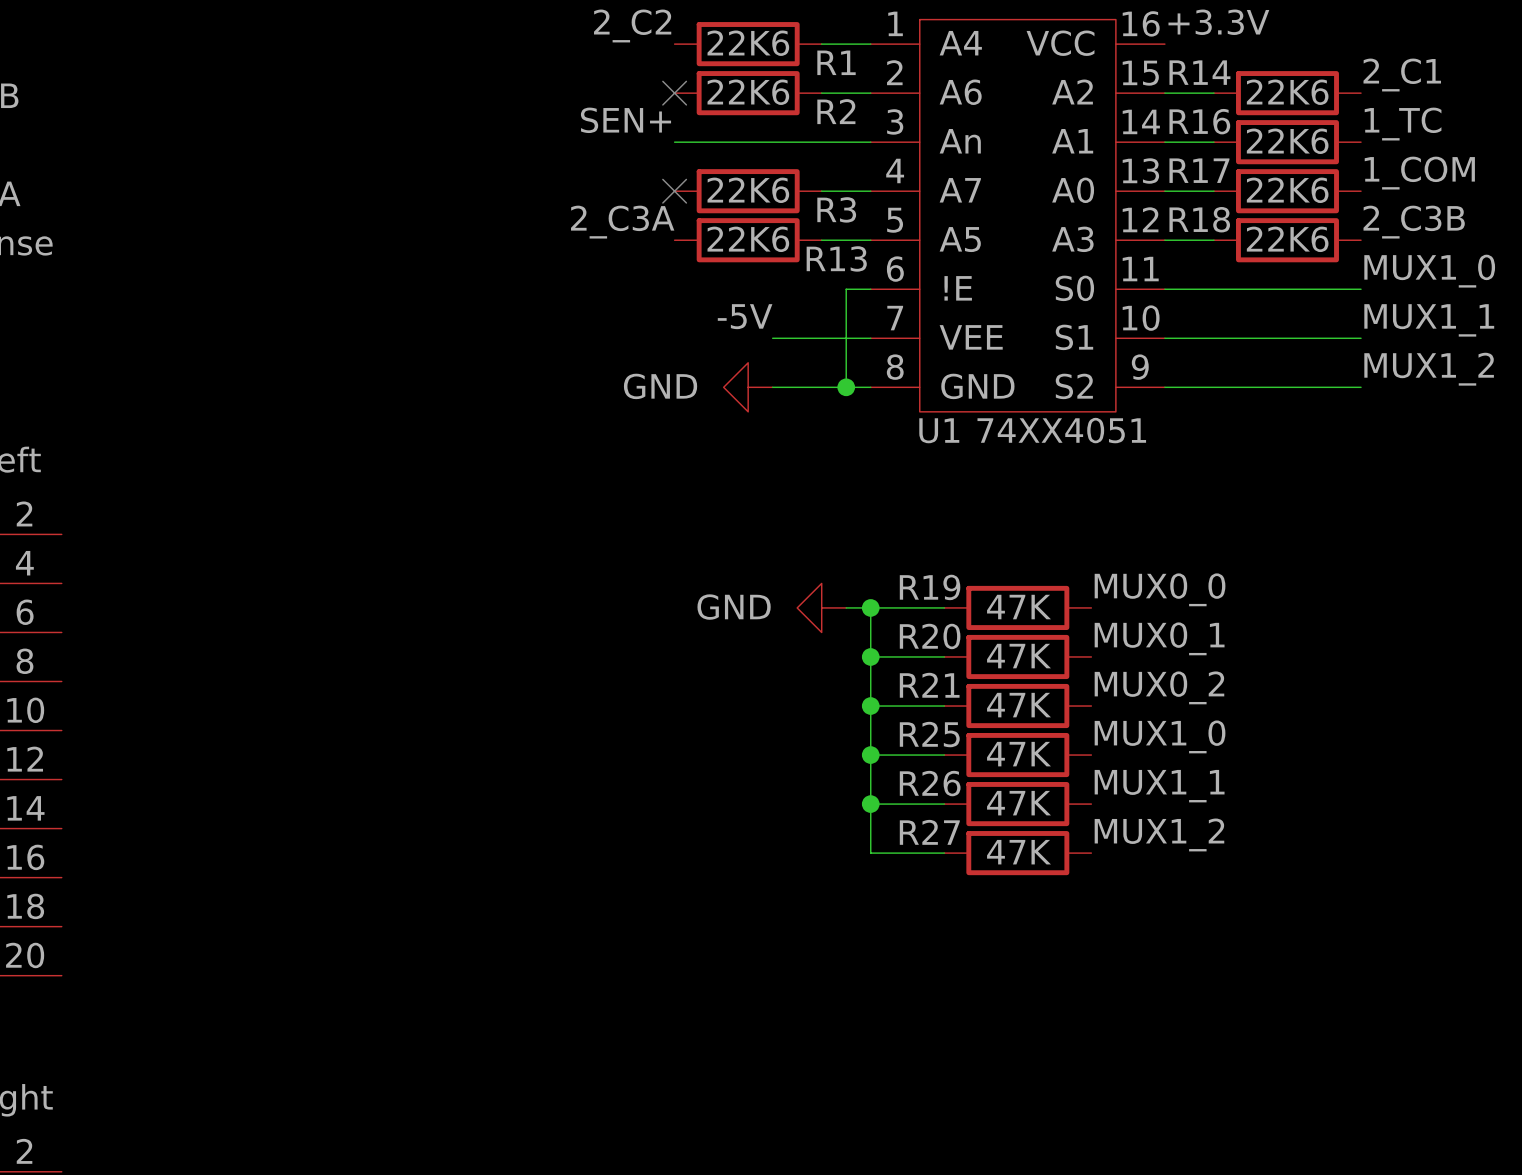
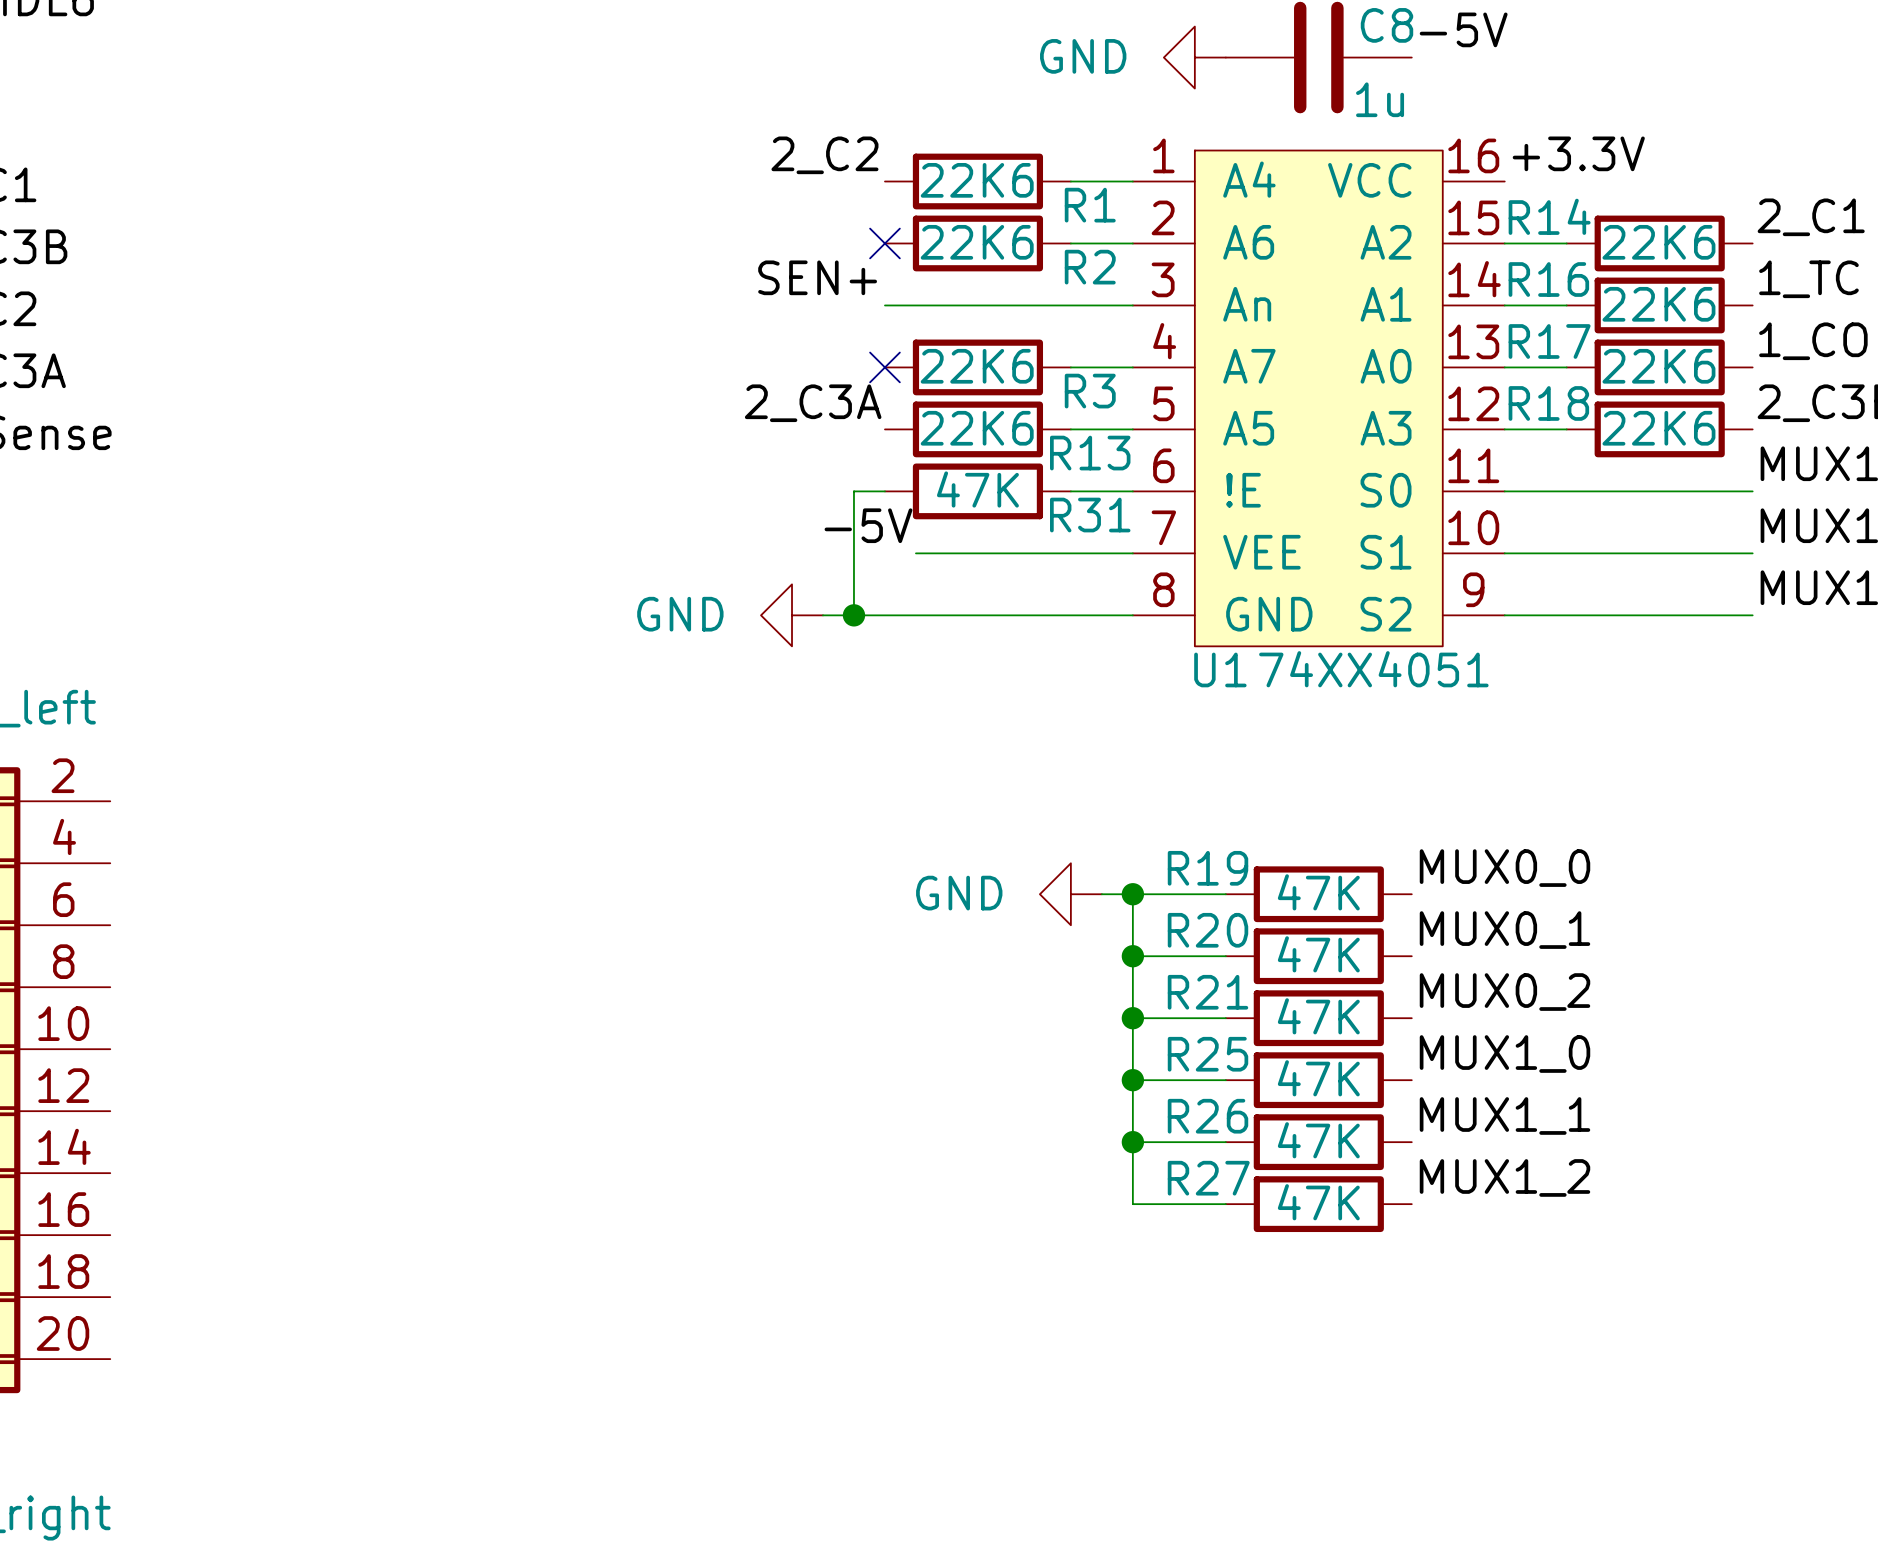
wire: none -> (884, 491) (853, 491) (853, 615)
R31: none -> 47K (977, 491)
wire: (846, 289) (846, 387) -> (1101, 491) (1070, 491)
label position: -5V (745, 316) -> -5V (868, 525)
wire: none -> (915, 553) (1008, 553)
wire: none -> (822, 615) (1008, 615)
junction: none -> (853, 615)
power symbol position: GND (748, 387) -> GND (792, 615)
junction: (846, 387) -> none

